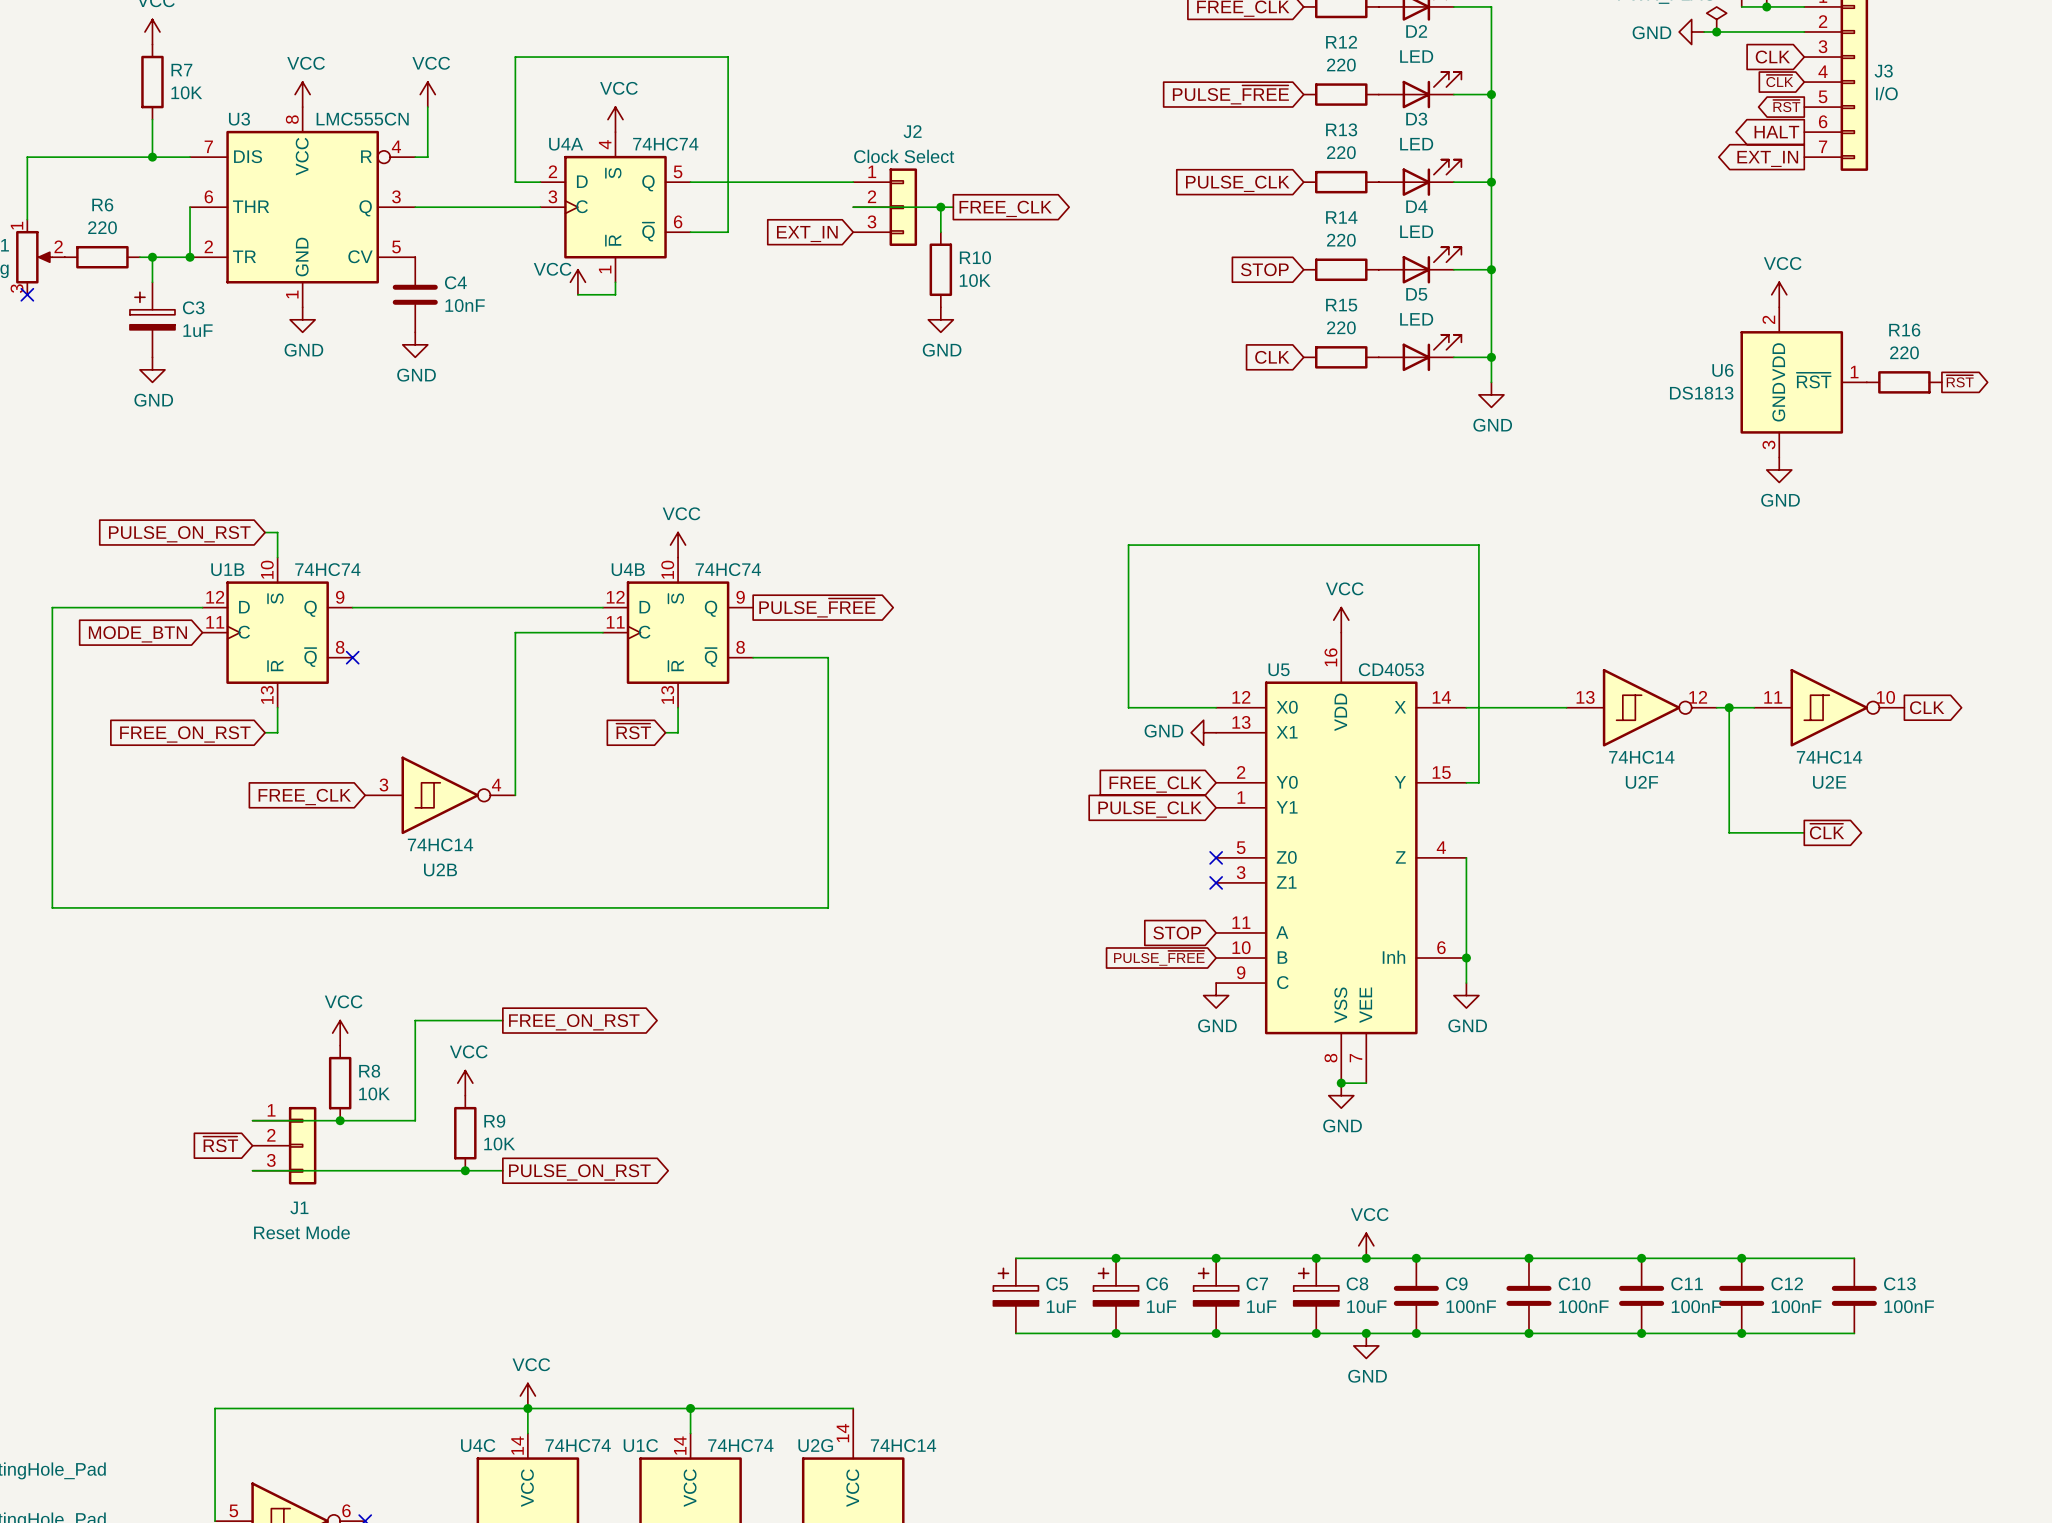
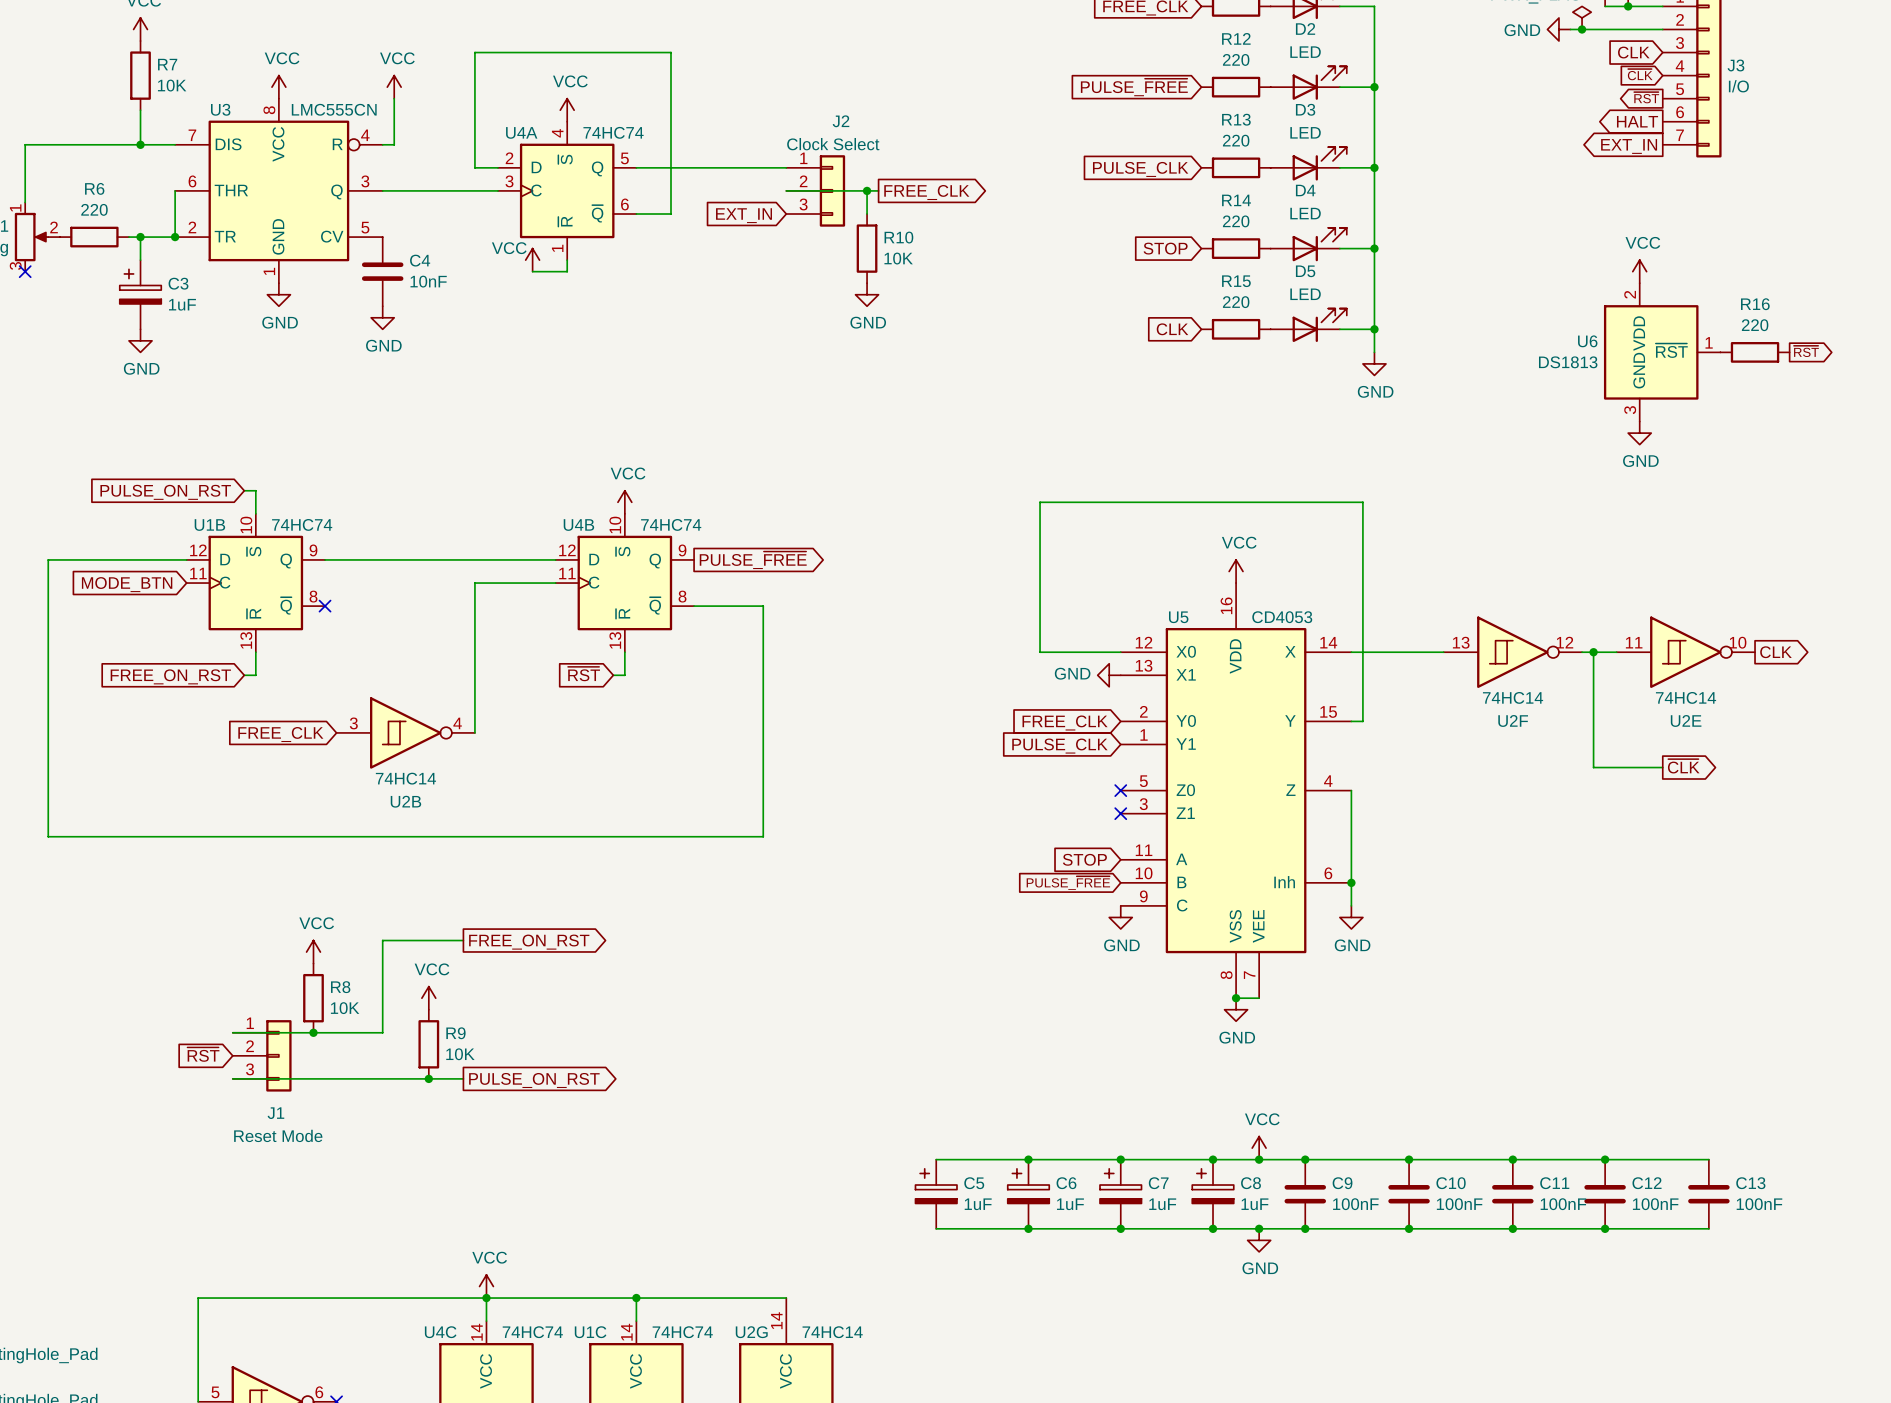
C8 value: 10uF (1366, 1306) -> 1uF (1254, 1204)

